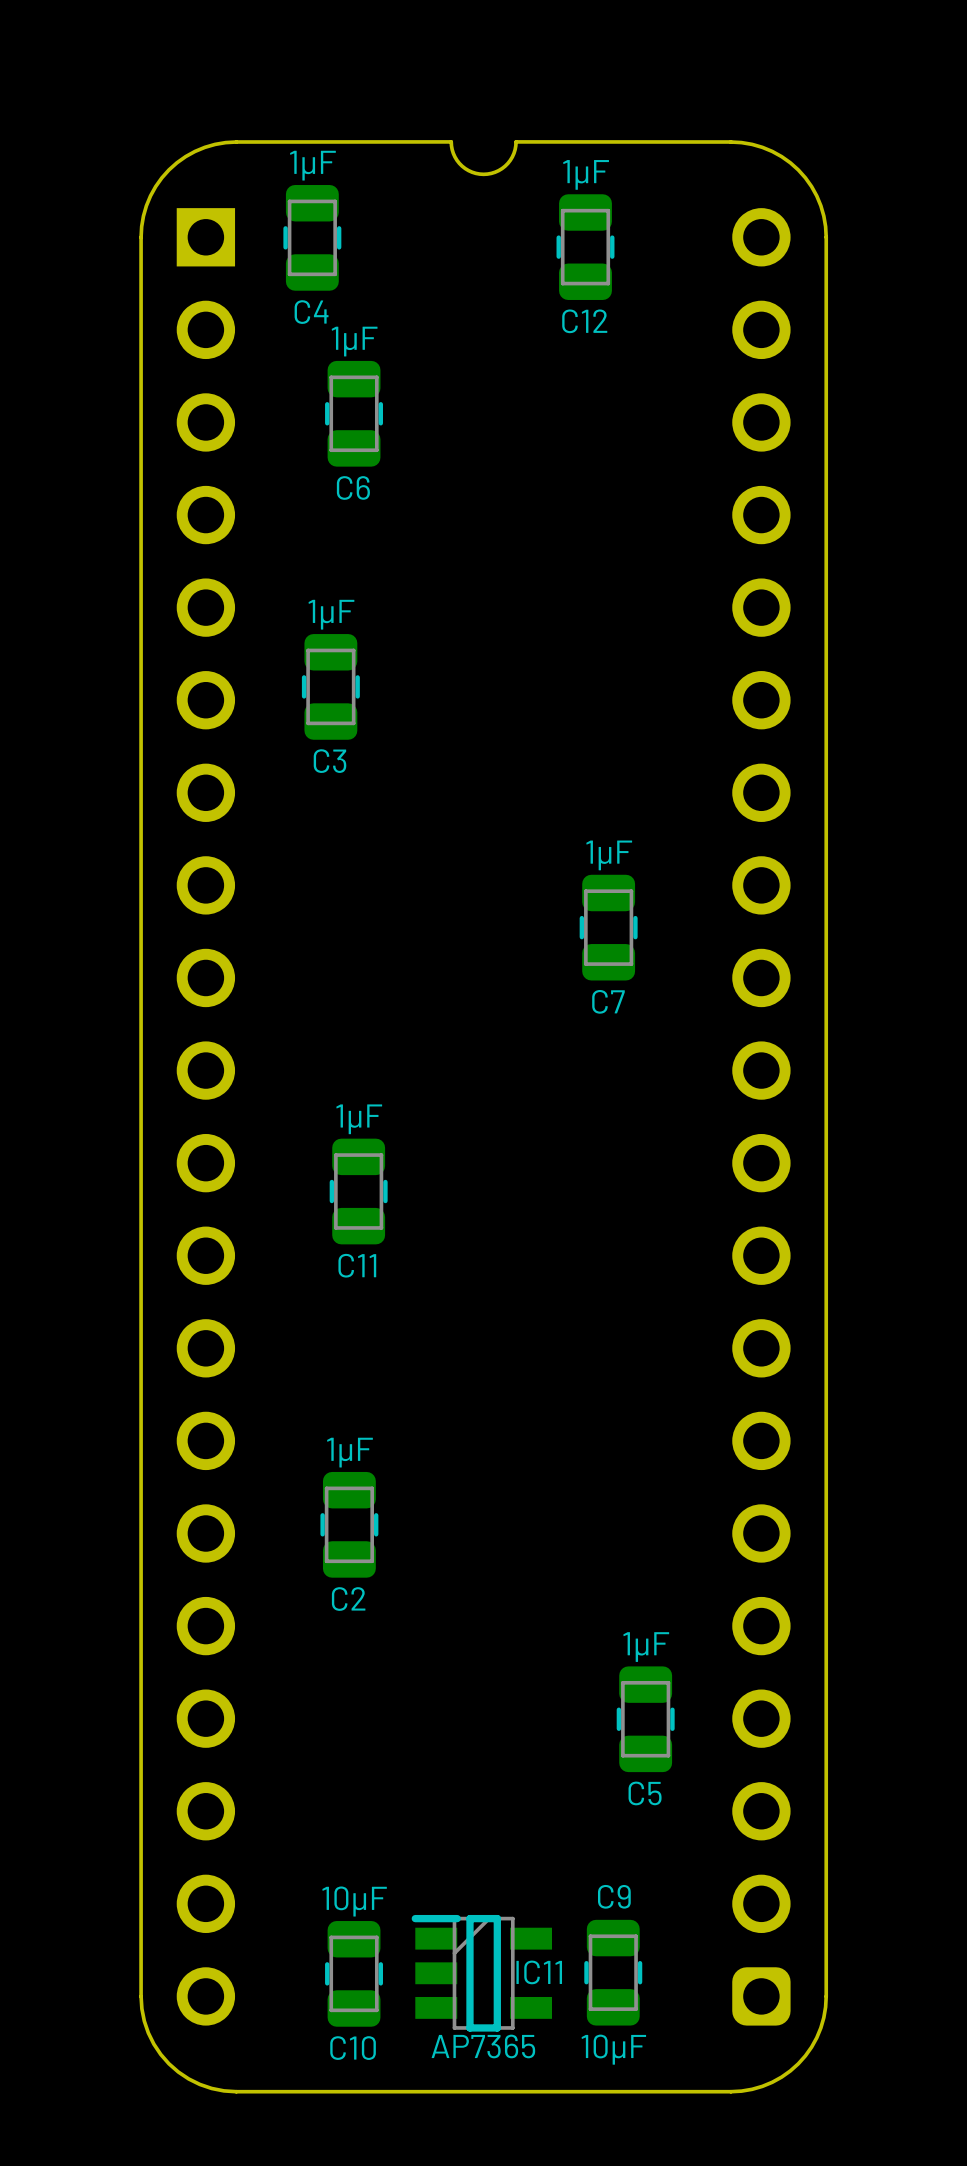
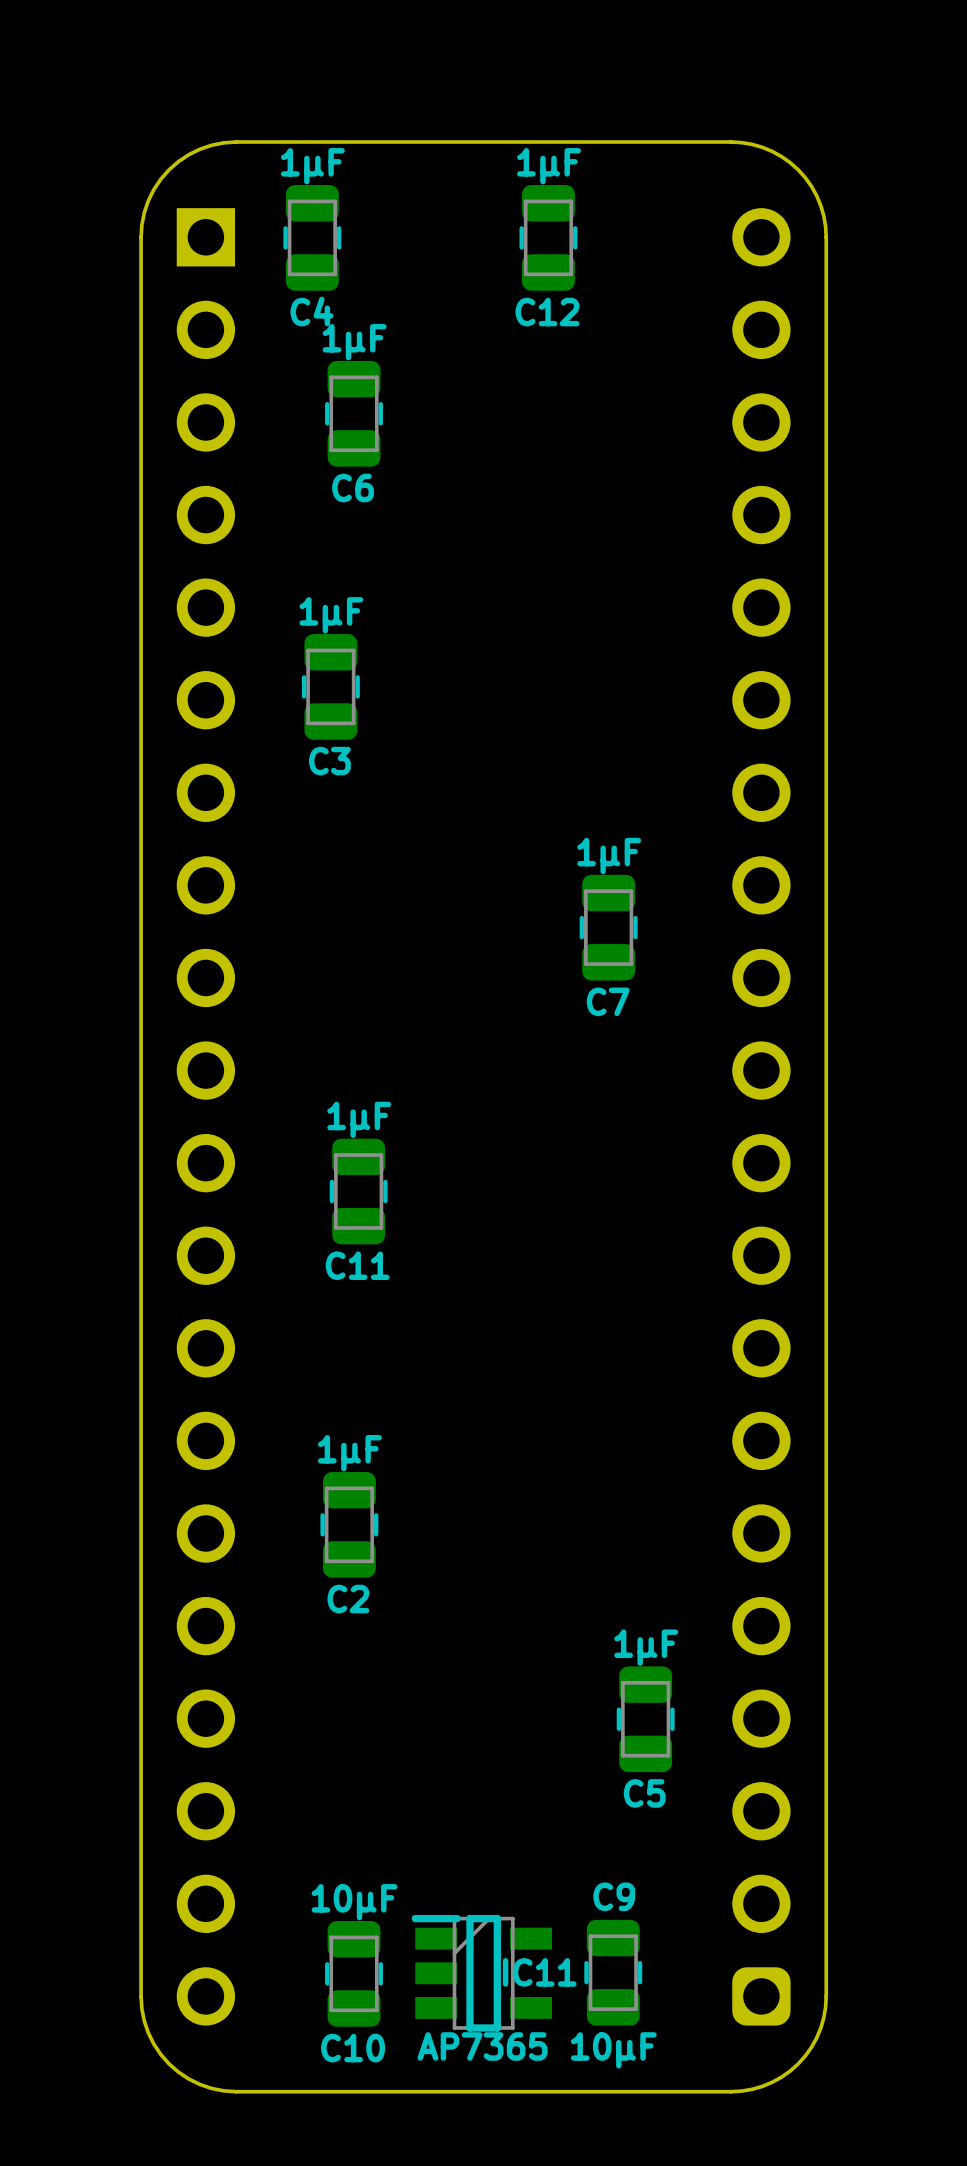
part footprint: [139, 140, 829, 2094] -> [139, 140, 829, 2094]
C12 position: (585, 247) -> (548, 237)

